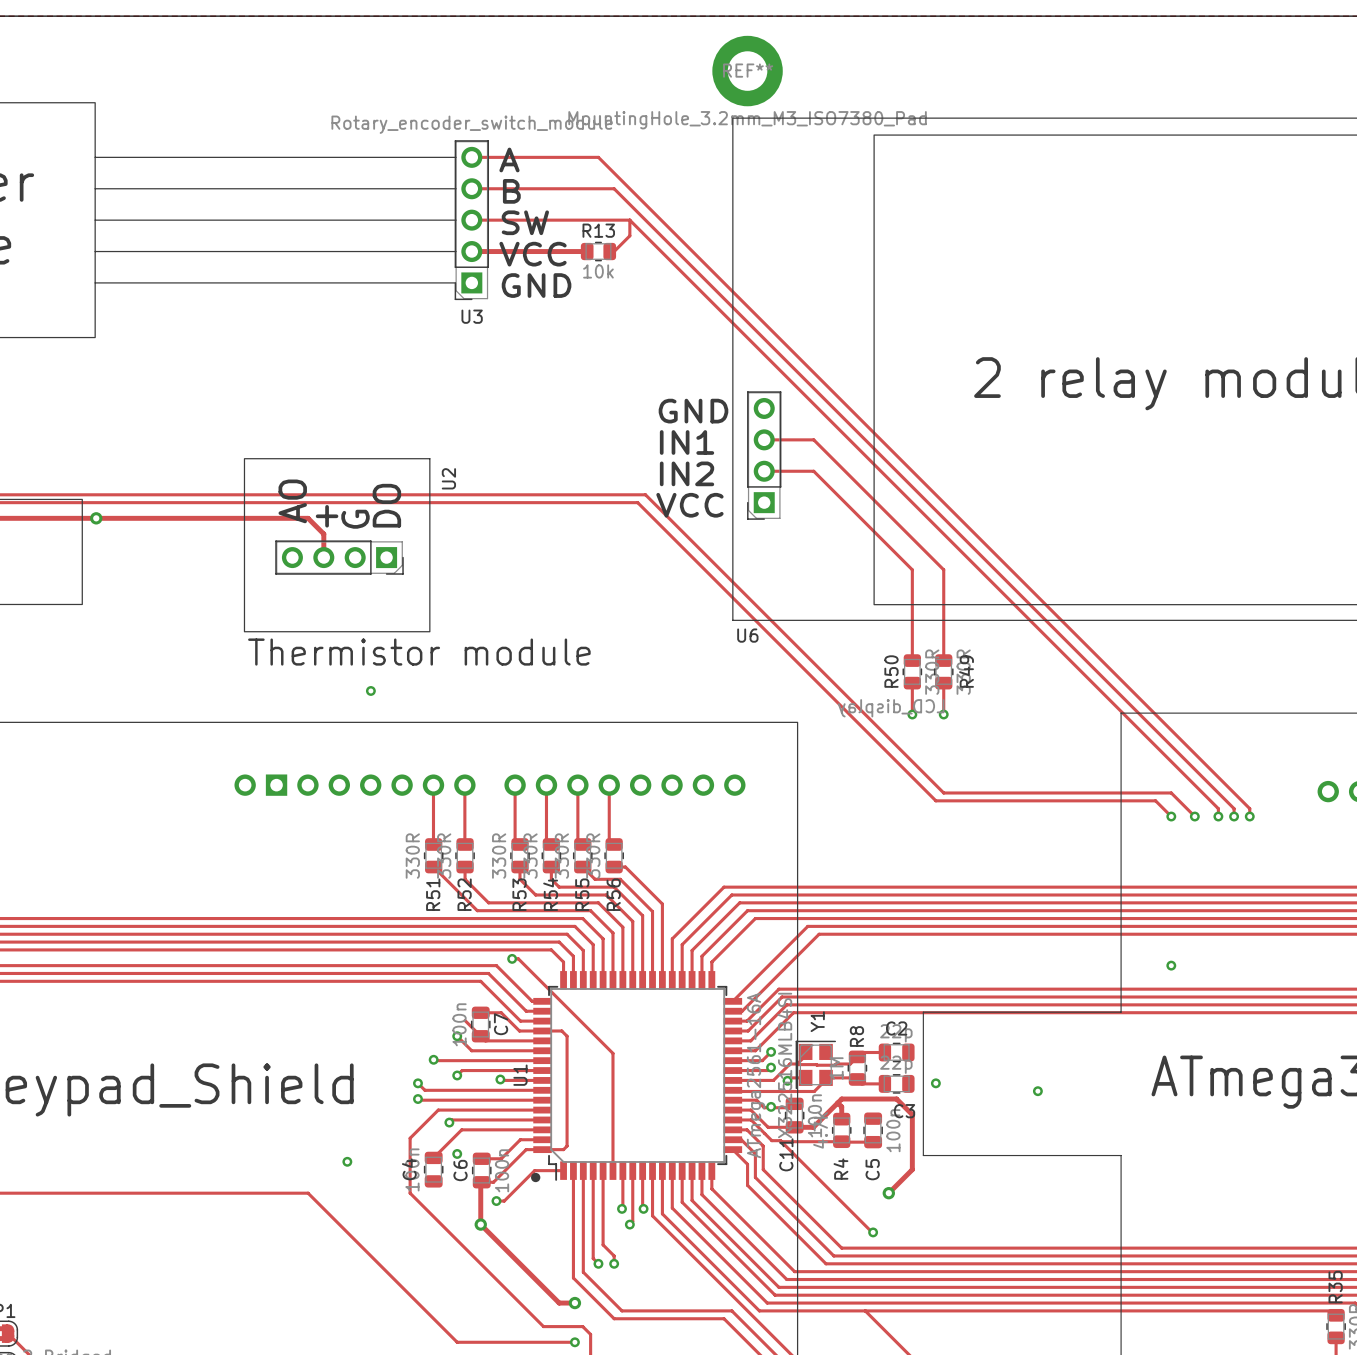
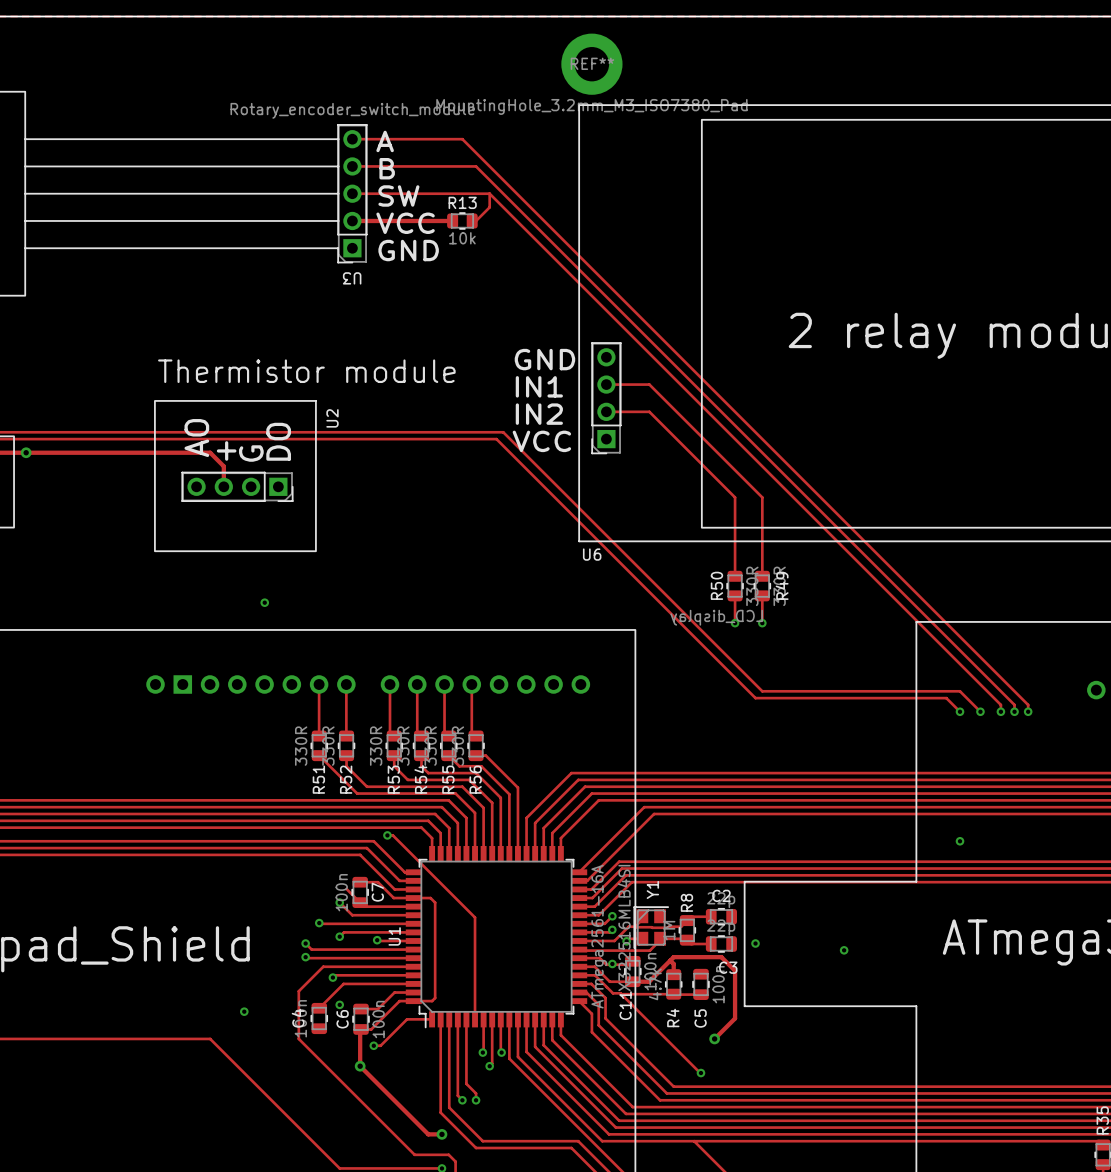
U3 name rotation: 0° (472, 316) -> 180° (352, 278)
text position: Thermistor module (419, 652) -> Thermistor module (306, 371)
drawing: [531, 1172, 541, 1183] -> none

